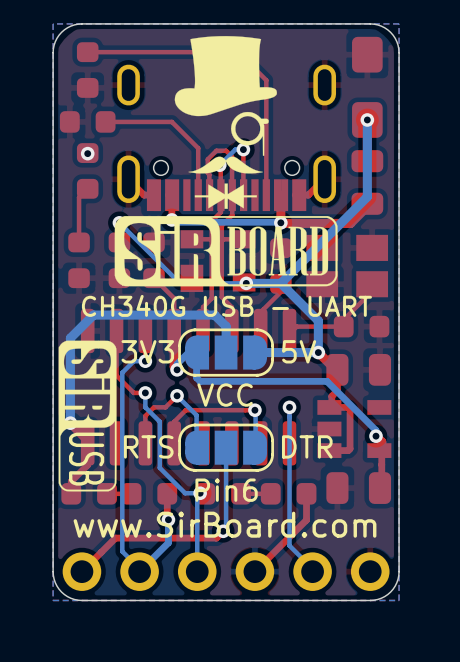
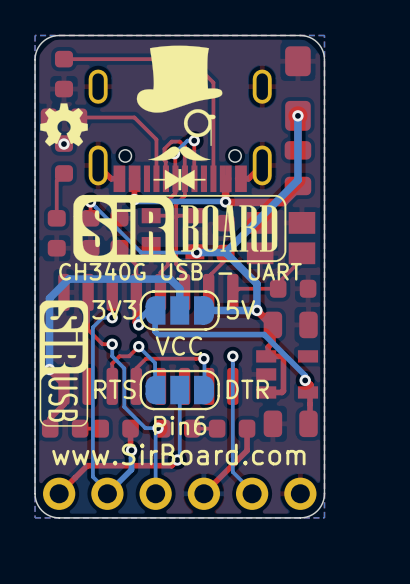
drawing: none -> [40, 103, 88, 147]
drawing shape: [114, 216, 338, 287] -> [73, 194, 287, 263]

